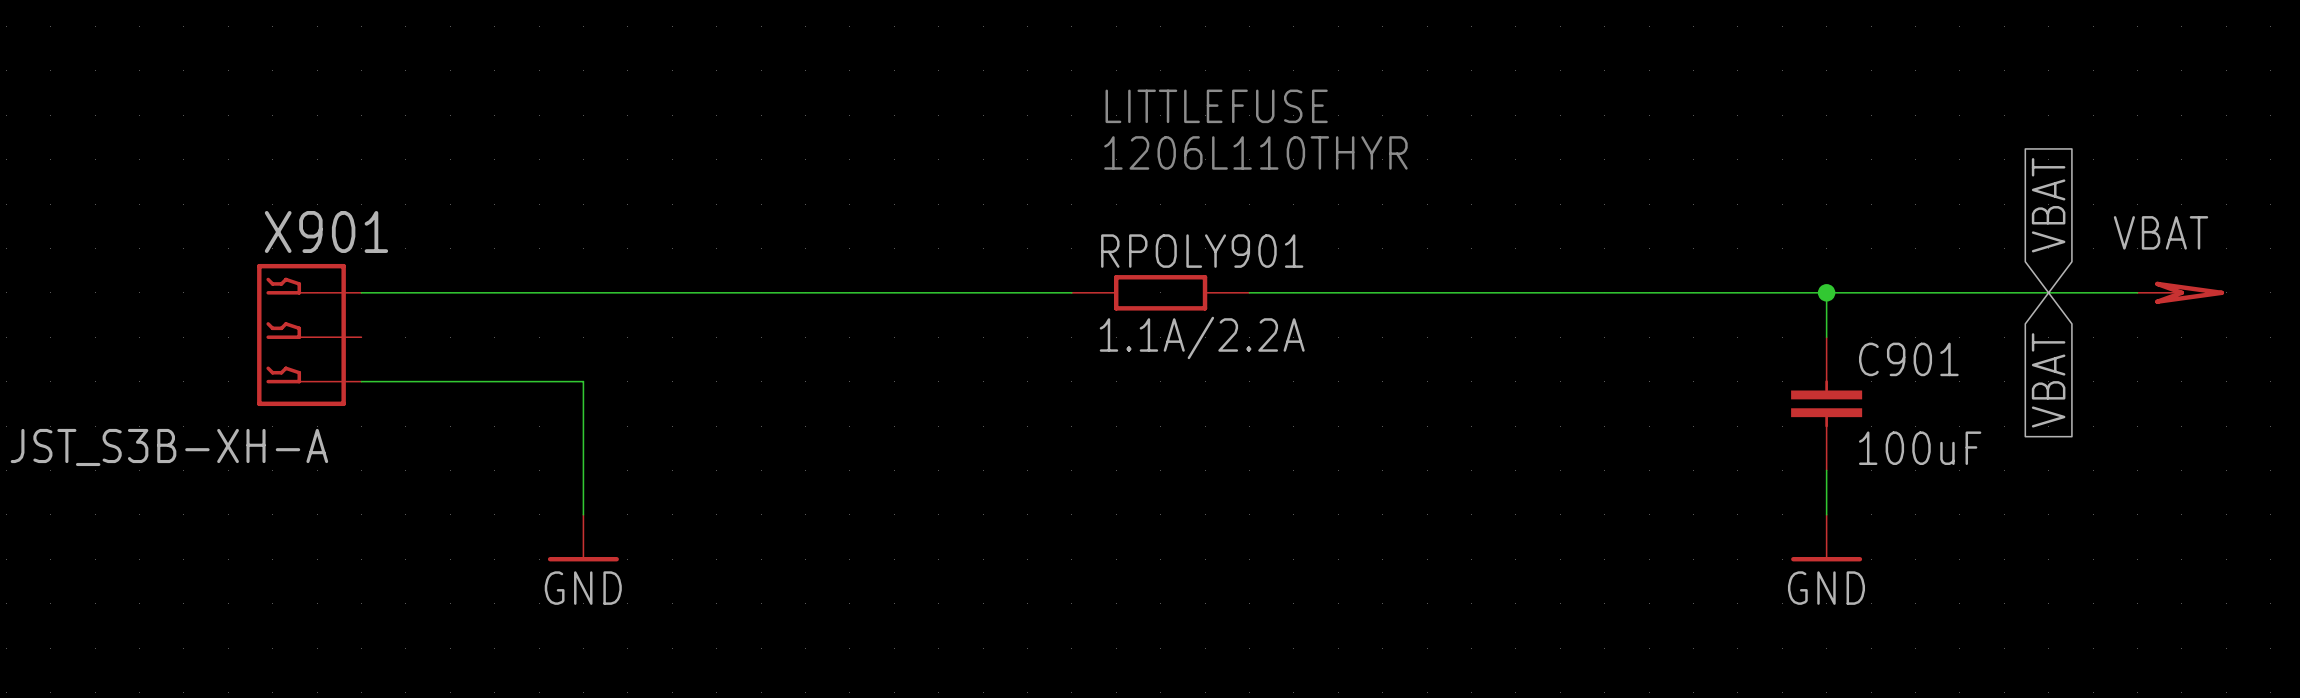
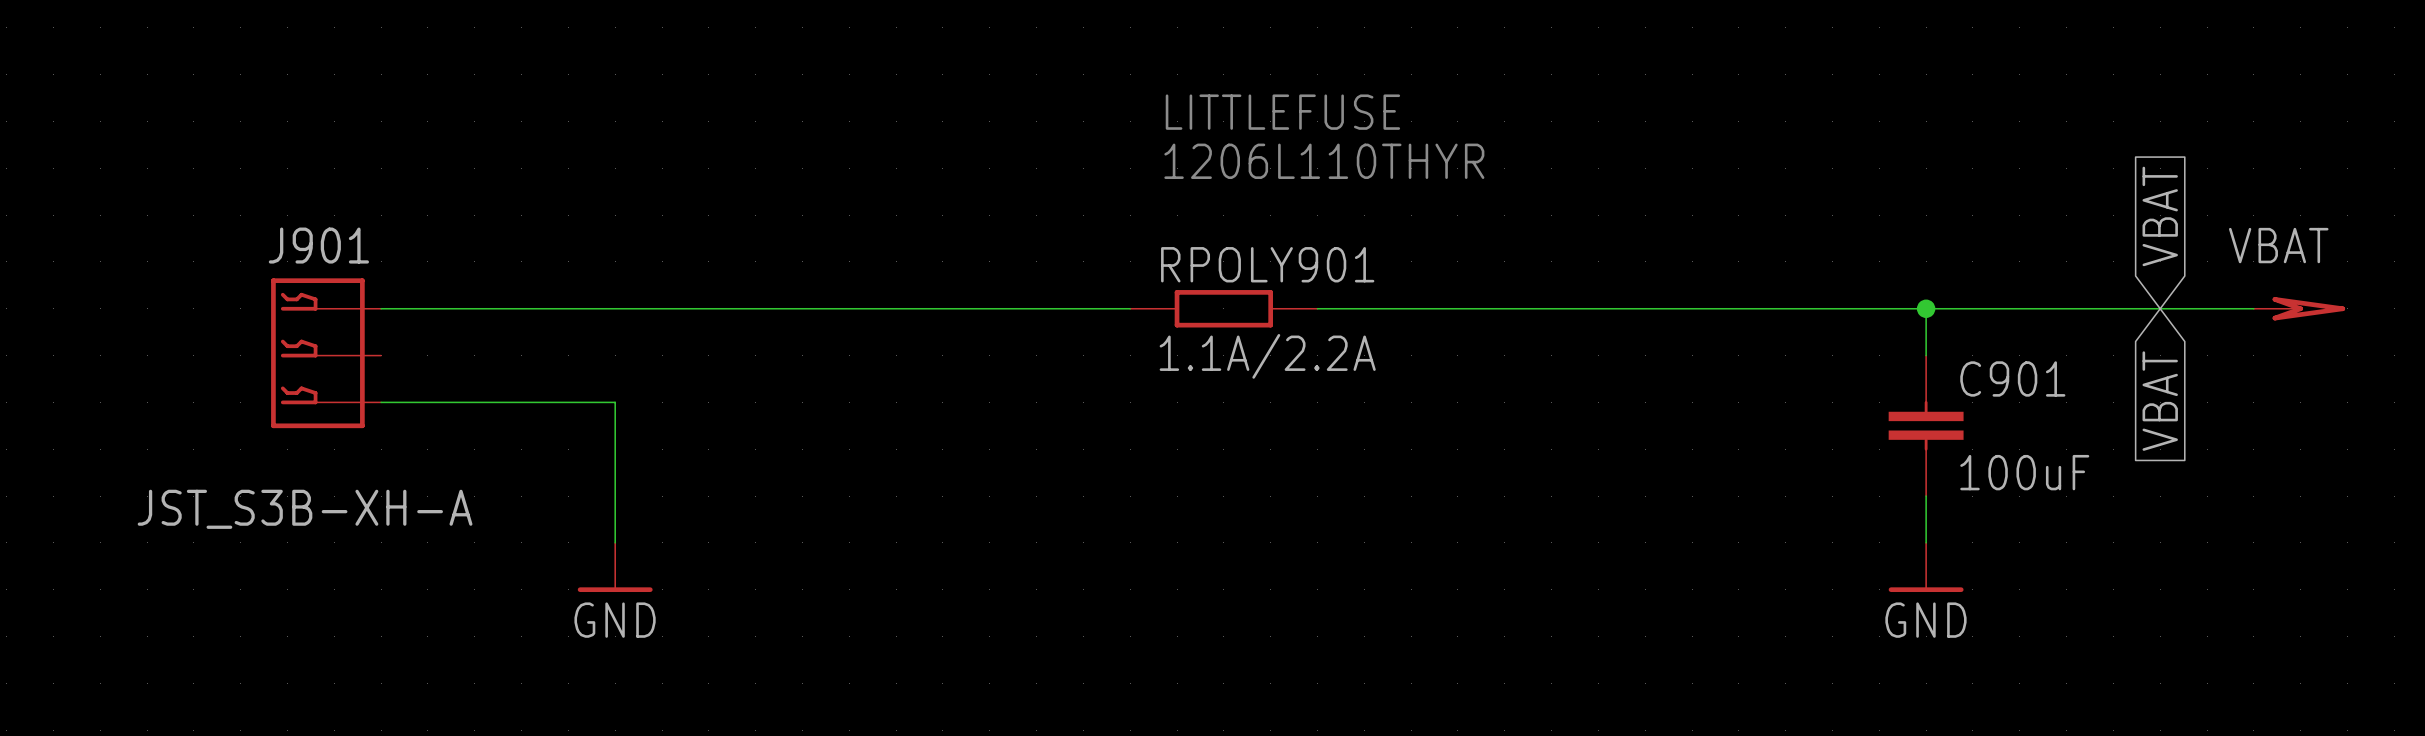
X901 name: X901 (326, 231) -> J901 (318, 245)
X901 value position: JST_S3B-XH-A (169, 447) -> JST_S3B-XH-A (305, 509)

